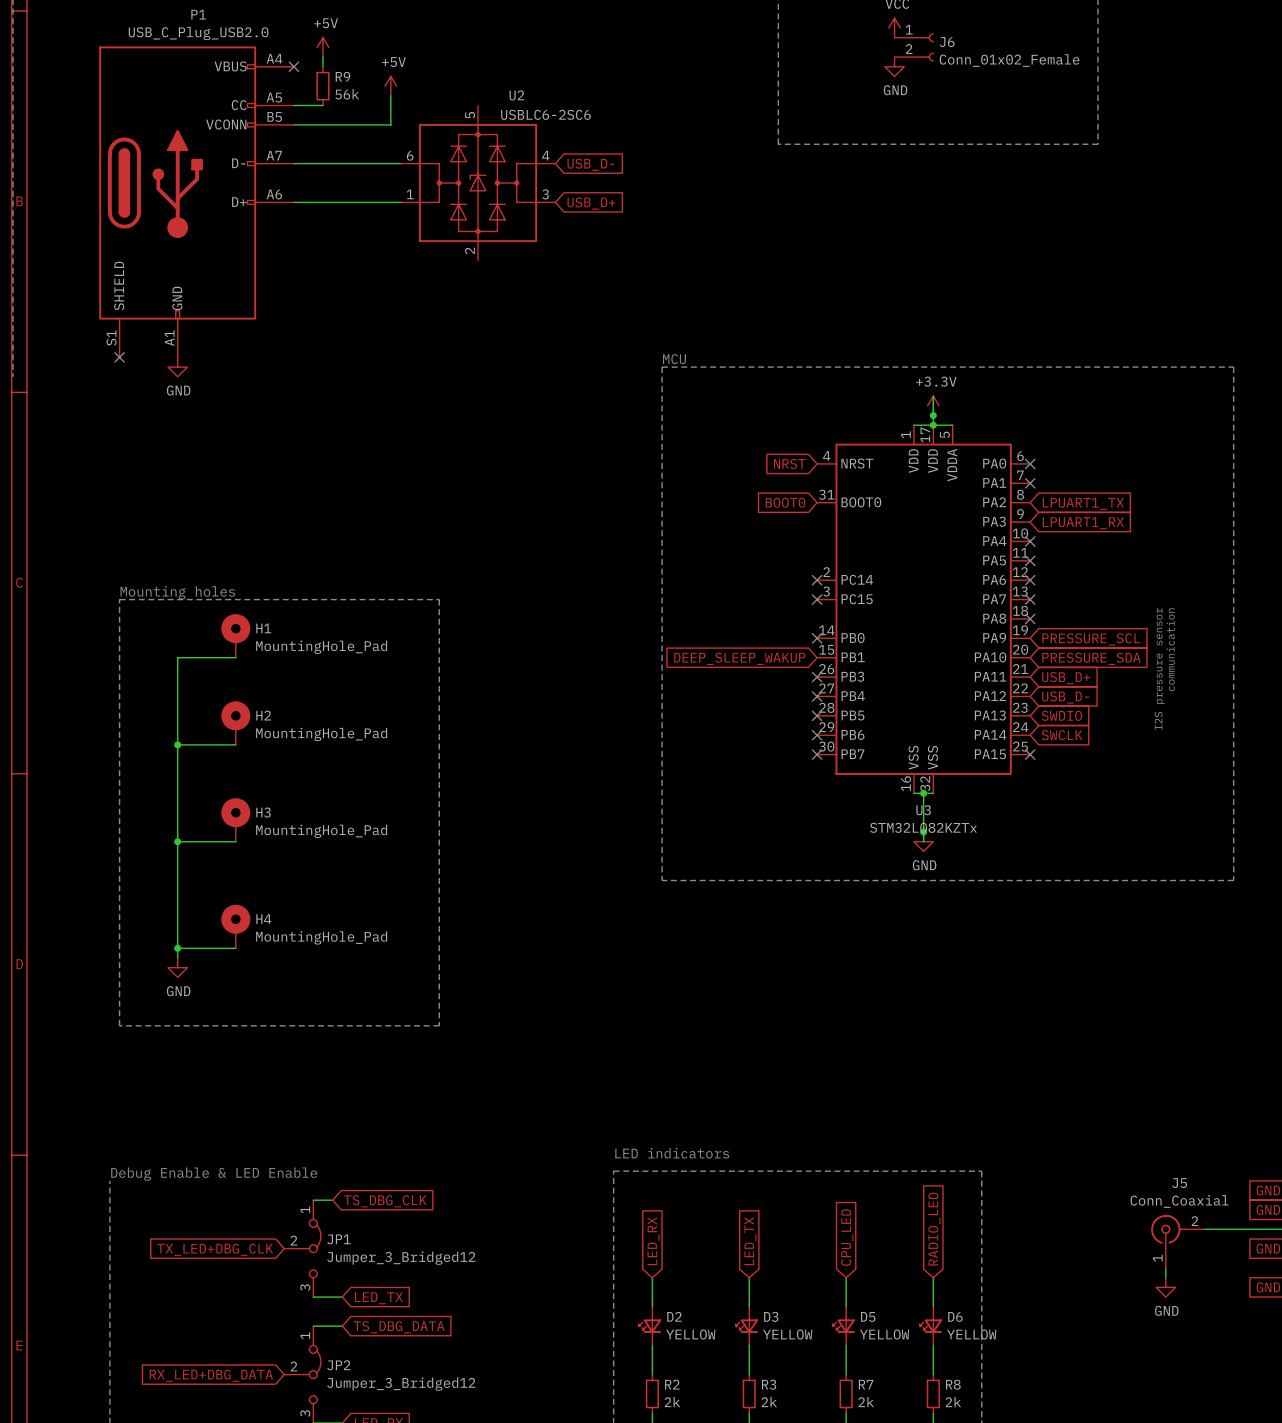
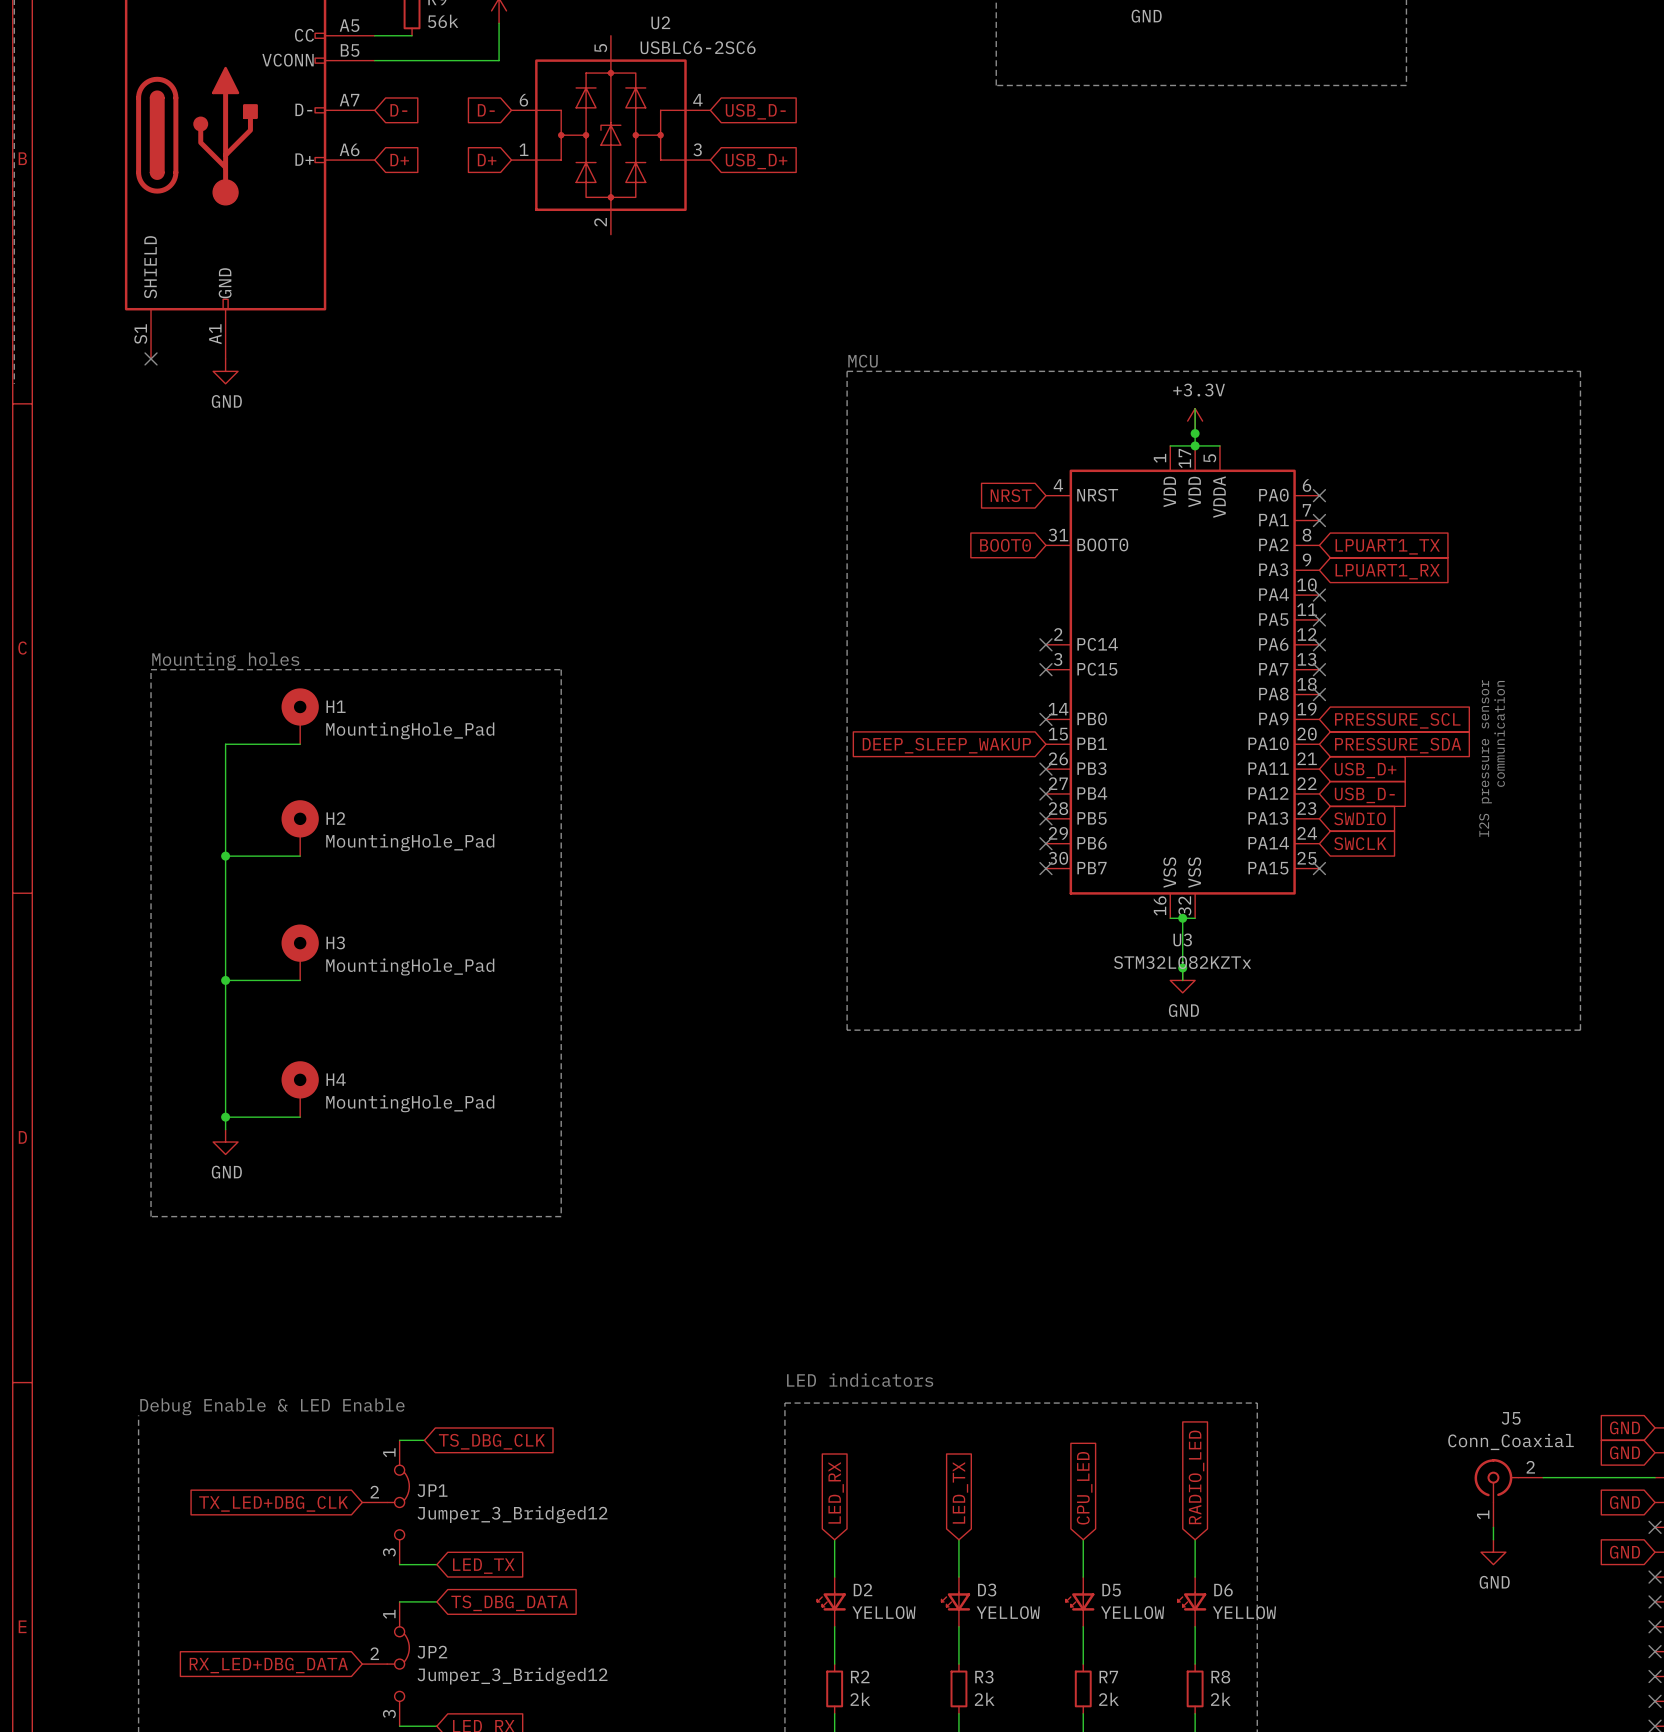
wire: (293, 163) (400, 163) -> none
global label: none -> D- (398, 110)
global label: none -> D- (486, 110)
wire: (293, 202) (400, 202) -> none
global label: none -> D+ (399, 160)
global label: none -> D+ (487, 160)

